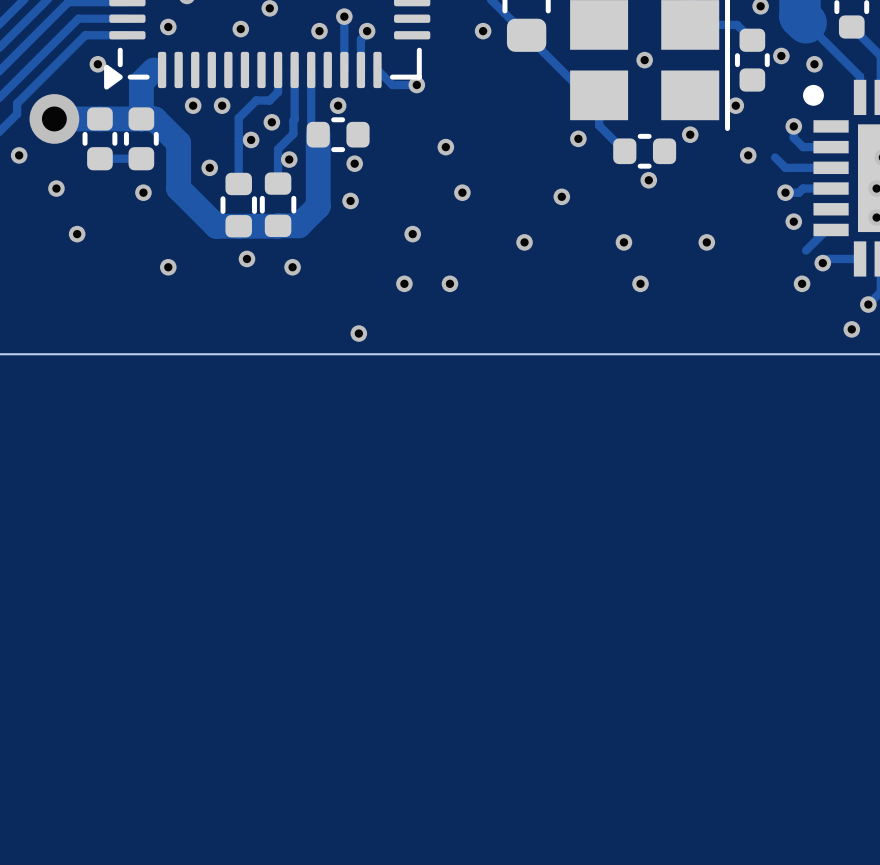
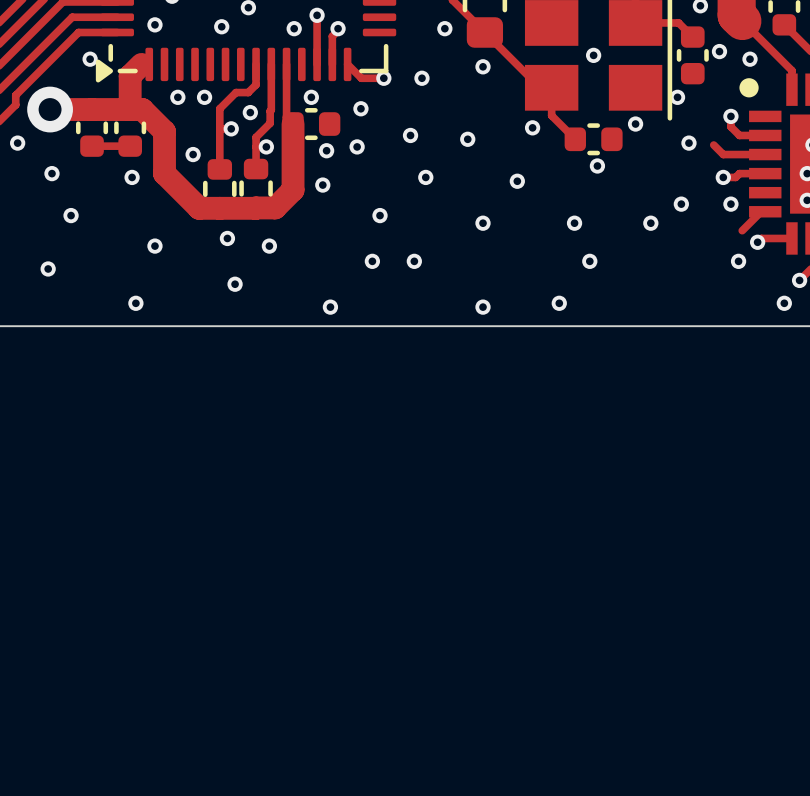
via: none -> (483, 66)
via: none -> (421, 78)
via: none -> (360, 108)
via: none -> (467, 139)
via: none -> (357, 146)
via: none -> (681, 204)
via: none -> (48, 268)
via: none -> (235, 284)
via: none -> (135, 303)
via: none -> (559, 303)
via: none -> (483, 307)

